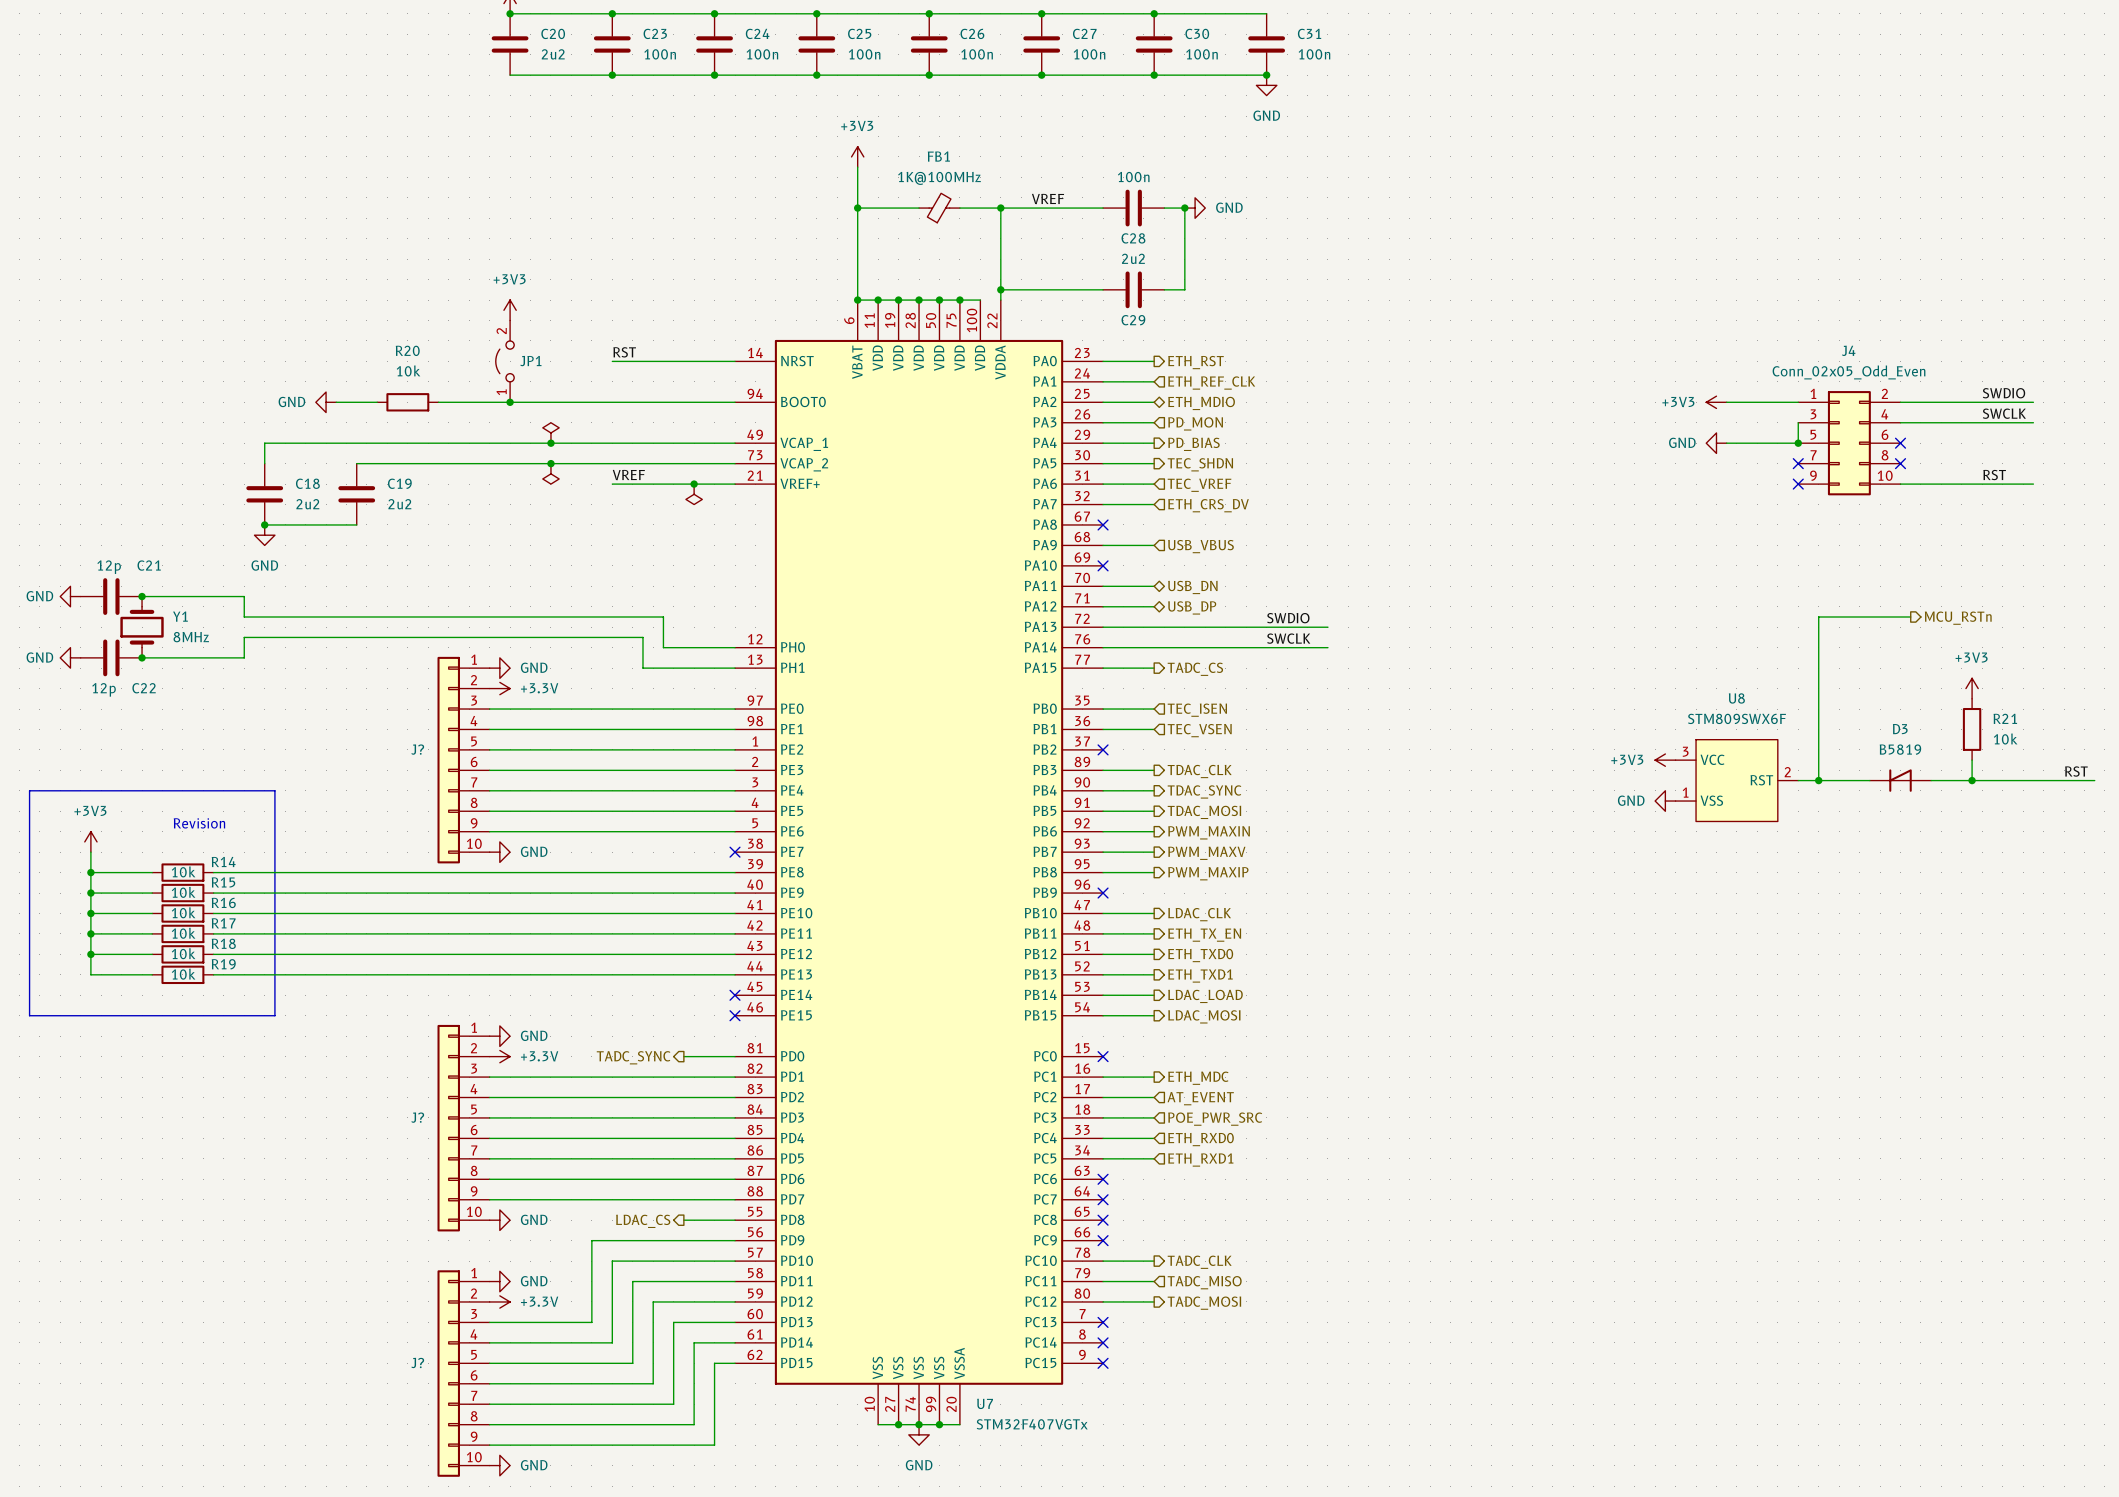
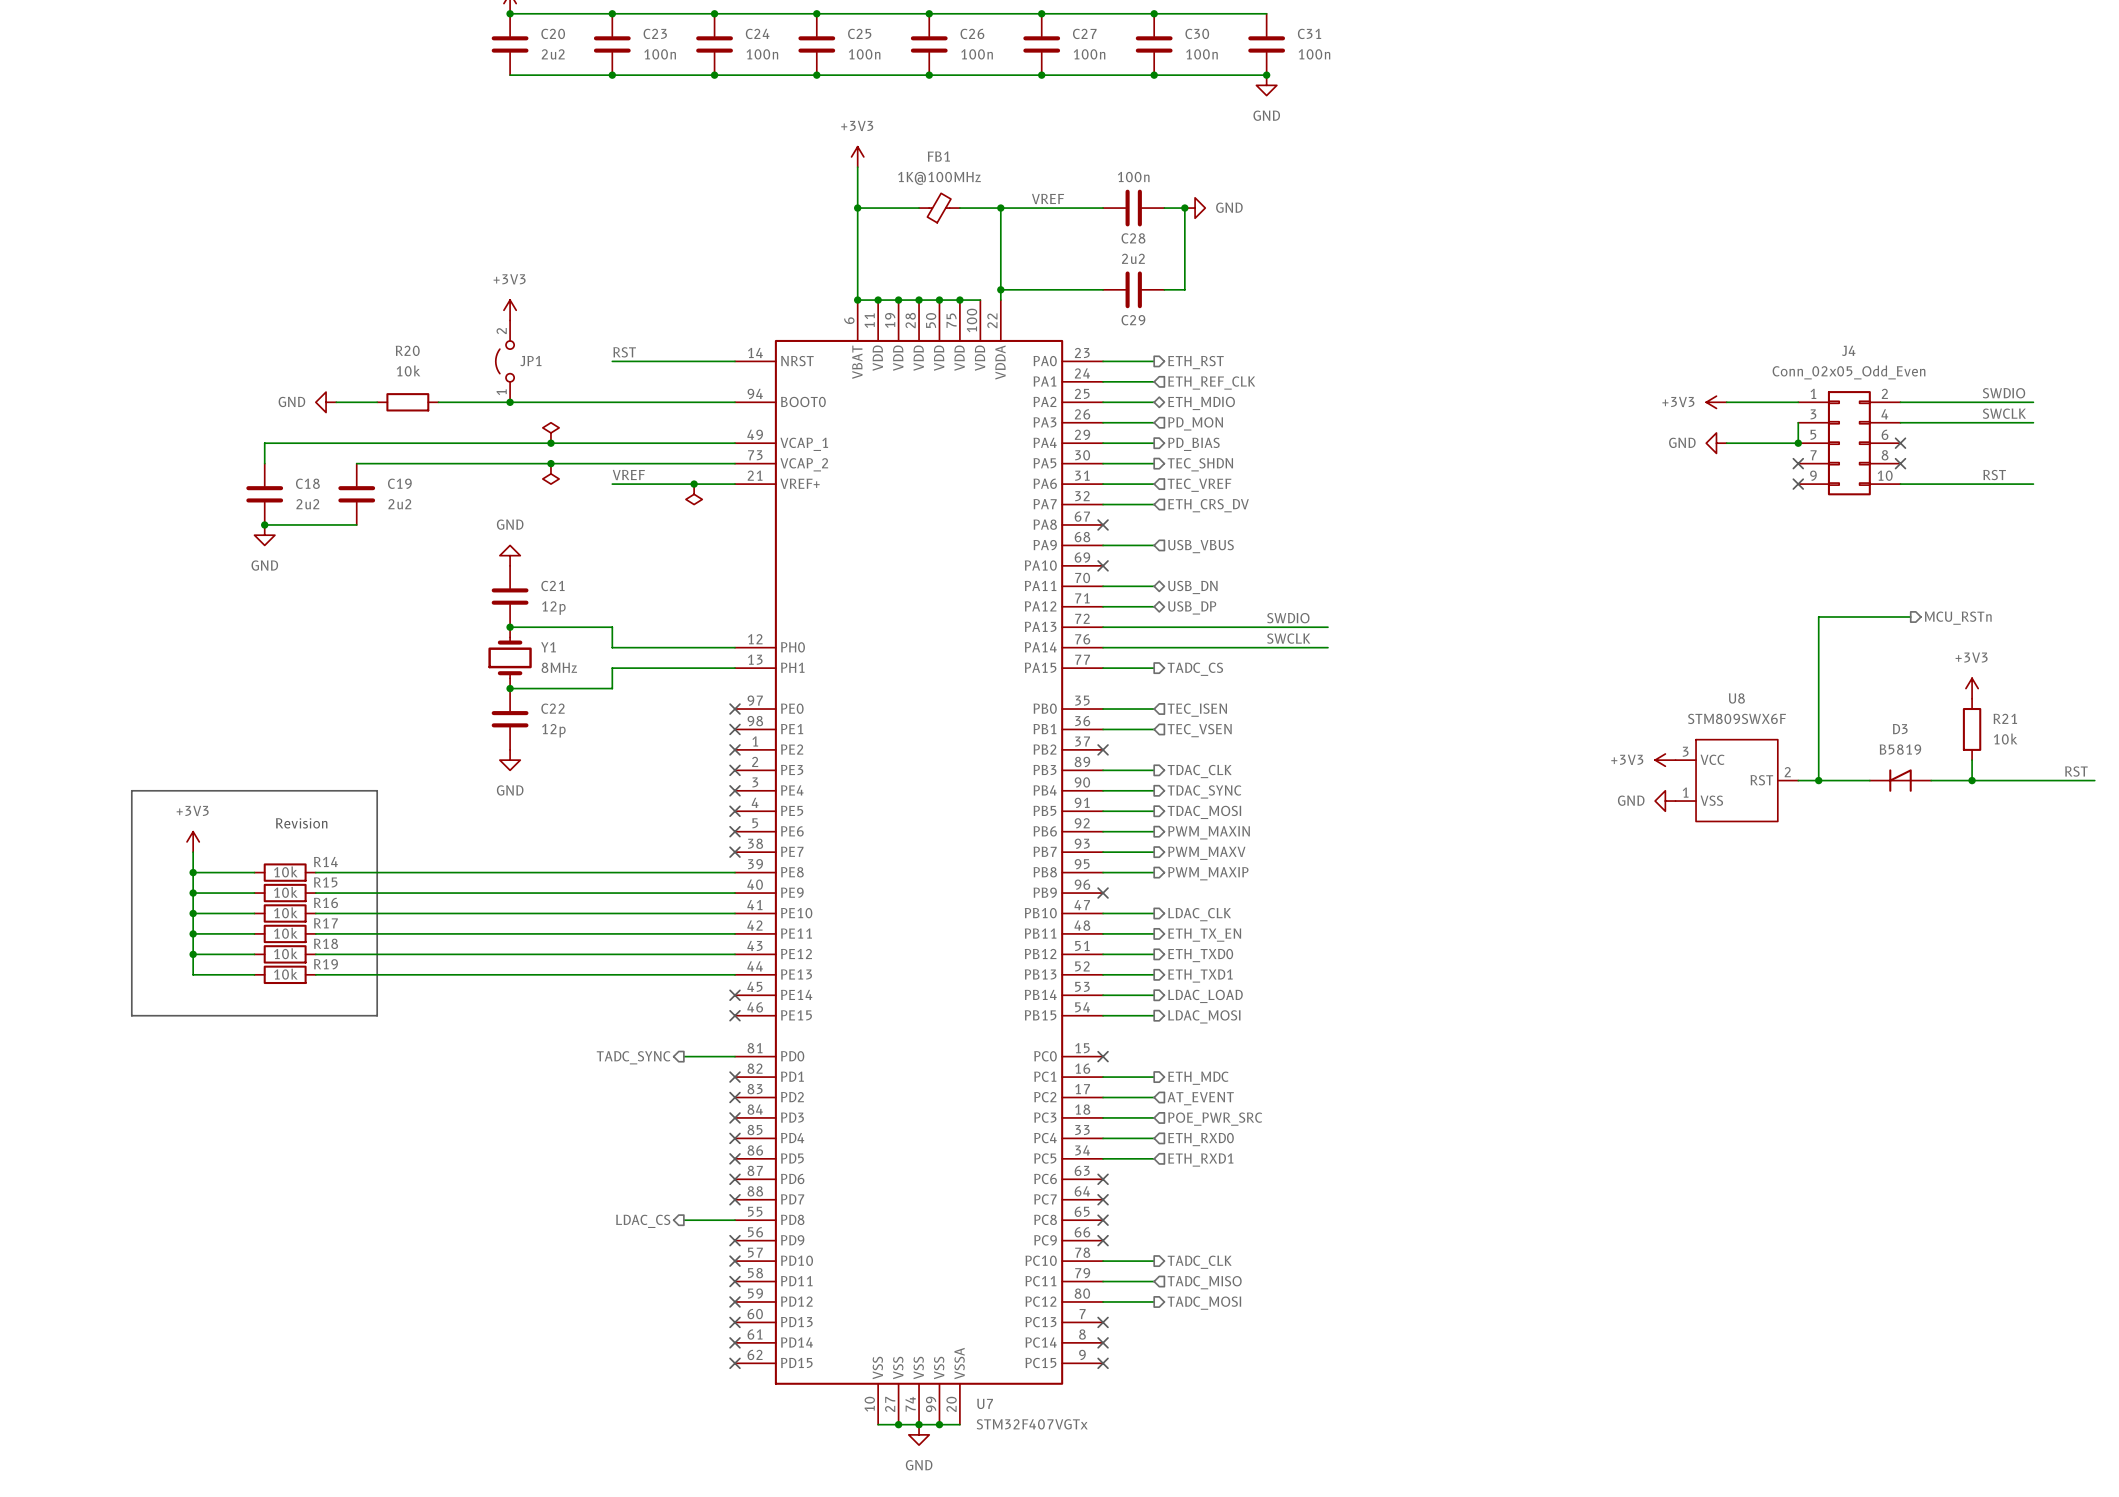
power symbol: none -> GND (510, 555)
C21 name position: C21 (149, 565) -> C21 (552, 586)
C21 value position: 12p (109, 567) -> 12p (553, 608)
power symbol: GND (70, 596) -> none
C21 rotation: 0° (111, 596) -> 90° clockwise (510, 596)
C21 position: (111, 596) -> (510, 596)
wire: (142, 596) (244, 596) (244, 616) (663, 616) (663, 647) -> (510, 627) (612, 627) (612, 647) (663, 647)
junction: (142, 596) -> none
Y1 position: (142, 627) -> (510, 657)
junction: none -> (510, 627)
power symbol: GND (70, 657) -> none
C22 rotation: 0° (111, 657) -> 90° clockwise (510, 719)
C22 position: (111, 657) -> (510, 719)
wire: (142, 657) (244, 657) (244, 637) (642, 637) (642, 668) -> (510, 688) (612, 688) (612, 668) (642, 668)
junction: (142, 657) -> none
power symbol: GND (499, 668) -> none
C22 name position: C22 (144, 688) -> C22 (553, 708)
power symbol: +3.3V (499, 688) -> none
junction: none -> (510, 688)
C22 value position: 12p (104, 689) -> 12p (553, 730)
wire: (489, 709) (735, 709) -> none
no-connect mark: none -> (735, 709)
wire: (489, 729) (735, 729) -> none
no-connect mark: none -> (735, 729)
wire: (489, 749) (735, 749) -> none
no-connect mark: none -> (735, 749)
J?: (463, 760) -> none
power symbol: none -> GND (510, 760)
wire: (489, 770) (735, 770) -> none
no-connect mark: none -> (735, 770)
line: (131, 790) (29, 790) (29, 1015) (131, 1015) -> (131, 790) (131, 1015)
line: (274, 790) (274, 1015) -> (274, 790) (377, 790) (377, 1015) (274, 1015)
wire: (489, 790) (735, 790) -> none
no-connect mark: none -> (735, 790)
wire: (489, 811) (735, 811) -> none
no-connect mark: none -> (735, 811)
text position: Revision (199, 823) -> Revision (301, 823)
wire: (489, 831) (735, 831) -> none
no-connect mark: none -> (735, 831)
power symbol position: +3V3 (90, 841) -> +3V3 (193, 841)
wire: (90, 852) (90, 974) (152, 974) -> none
wire: none -> (193, 852) (193, 974) (213, 974)
power symbol: GND (499, 852) -> none
wire: (90, 872) (152, 872) -> none
junction: (90, 872) -> none
R14 position: (182, 872) -> (285, 872)
junction: none -> (193, 872)
wire: (254, 872) (315, 872) -> none
wire: (90, 893) (152, 893) -> none
junction: (90, 893) -> none
R15 position: (182, 893) -> (285, 893)
junction: none -> (193, 893)
wire: (254, 893) (315, 893) -> none
wire: (90, 913) (152, 913) -> none
junction: (90, 913) -> none
R16 position: (182, 913) -> (285, 913)
junction: none -> (193, 913)
wire: (254, 913) (315, 913) -> none
wire: (90, 933) (152, 933) -> none
junction: (90, 933) -> none
R17 position: (182, 933) -> (285, 933)
junction: none -> (193, 933)
wire: (254, 933) (315, 933) -> none
wire: (90, 954) (152, 954) -> none
junction: (90, 954) -> none
R18 position: (182, 954) -> (285, 954)
junction: none -> (193, 954)
wire: (254, 954) (315, 954) -> none
R19 position: (182, 974) -> (285, 974)
wire: (254, 974) (315, 974) -> none
power symbol: GND (499, 1036) -> none
power symbol: +3.3V (499, 1056) -> none
wire: (489, 1077) (735, 1077) -> none
no-connect mark: none -> (735, 1077)
wire: (489, 1097) (735, 1097) -> none
no-connect mark: none -> (735, 1097)
wire: (489, 1117) (735, 1117) -> none
no-connect mark: none -> (735, 1117)
J?: (463, 1128) -> none
wire: (489, 1138) (735, 1138) -> none
no-connect mark: none -> (735, 1138)
wire: (489, 1158) (735, 1158) -> none
no-connect mark: none -> (735, 1158)
wire: (489, 1179) (735, 1179) -> none
no-connect mark: none -> (735, 1179)
wire: (489, 1199) (735, 1199) -> none
no-connect mark: none -> (735, 1199)
power symbol: GND (499, 1220) -> none
wire: (735, 1240) (591, 1240) (591, 1322) (489, 1322) -> none
no-connect mark: none -> (735, 1240)
wire: (735, 1261) (612, 1261) (612, 1342) (489, 1342) -> none
no-connect mark: none -> (735, 1261)
power symbol: GND (499, 1281) -> none
wire: (735, 1281) (632, 1281) (632, 1363) (489, 1363) -> none
no-connect mark: none -> (735, 1281)
power symbol: +3.3V (499, 1301) -> none
wire: (735, 1301) (653, 1301) (653, 1383) (489, 1383) -> none
no-connect mark: none -> (735, 1301)
wire: (735, 1322) (673, 1322) (673, 1404) (489, 1404) -> none
no-connect mark: none -> (735, 1322)
wire: (735, 1342) (694, 1342) (694, 1424) (489, 1424) -> none
no-connect mark: none -> (735, 1342)
wire: (735, 1363) (714, 1363) (714, 1445) (489, 1445) -> none
no-connect mark: none -> (735, 1363)
J?: (463, 1373) -> none
power symbol: GND (499, 1465) -> none

